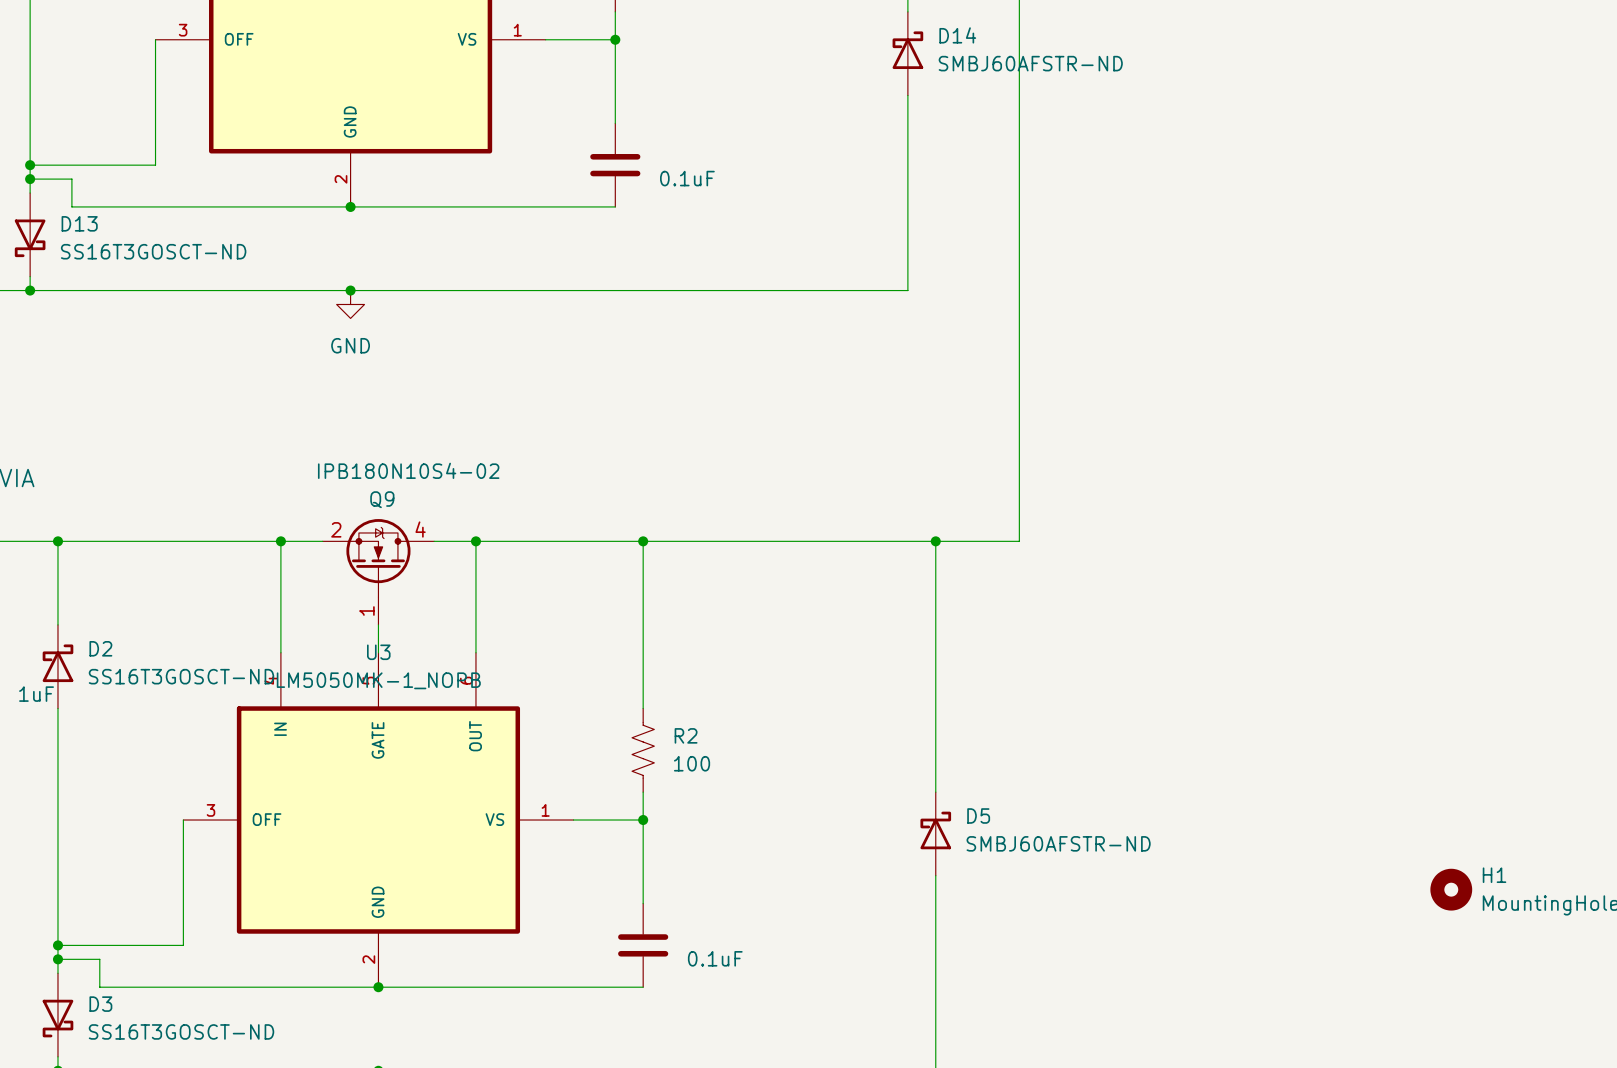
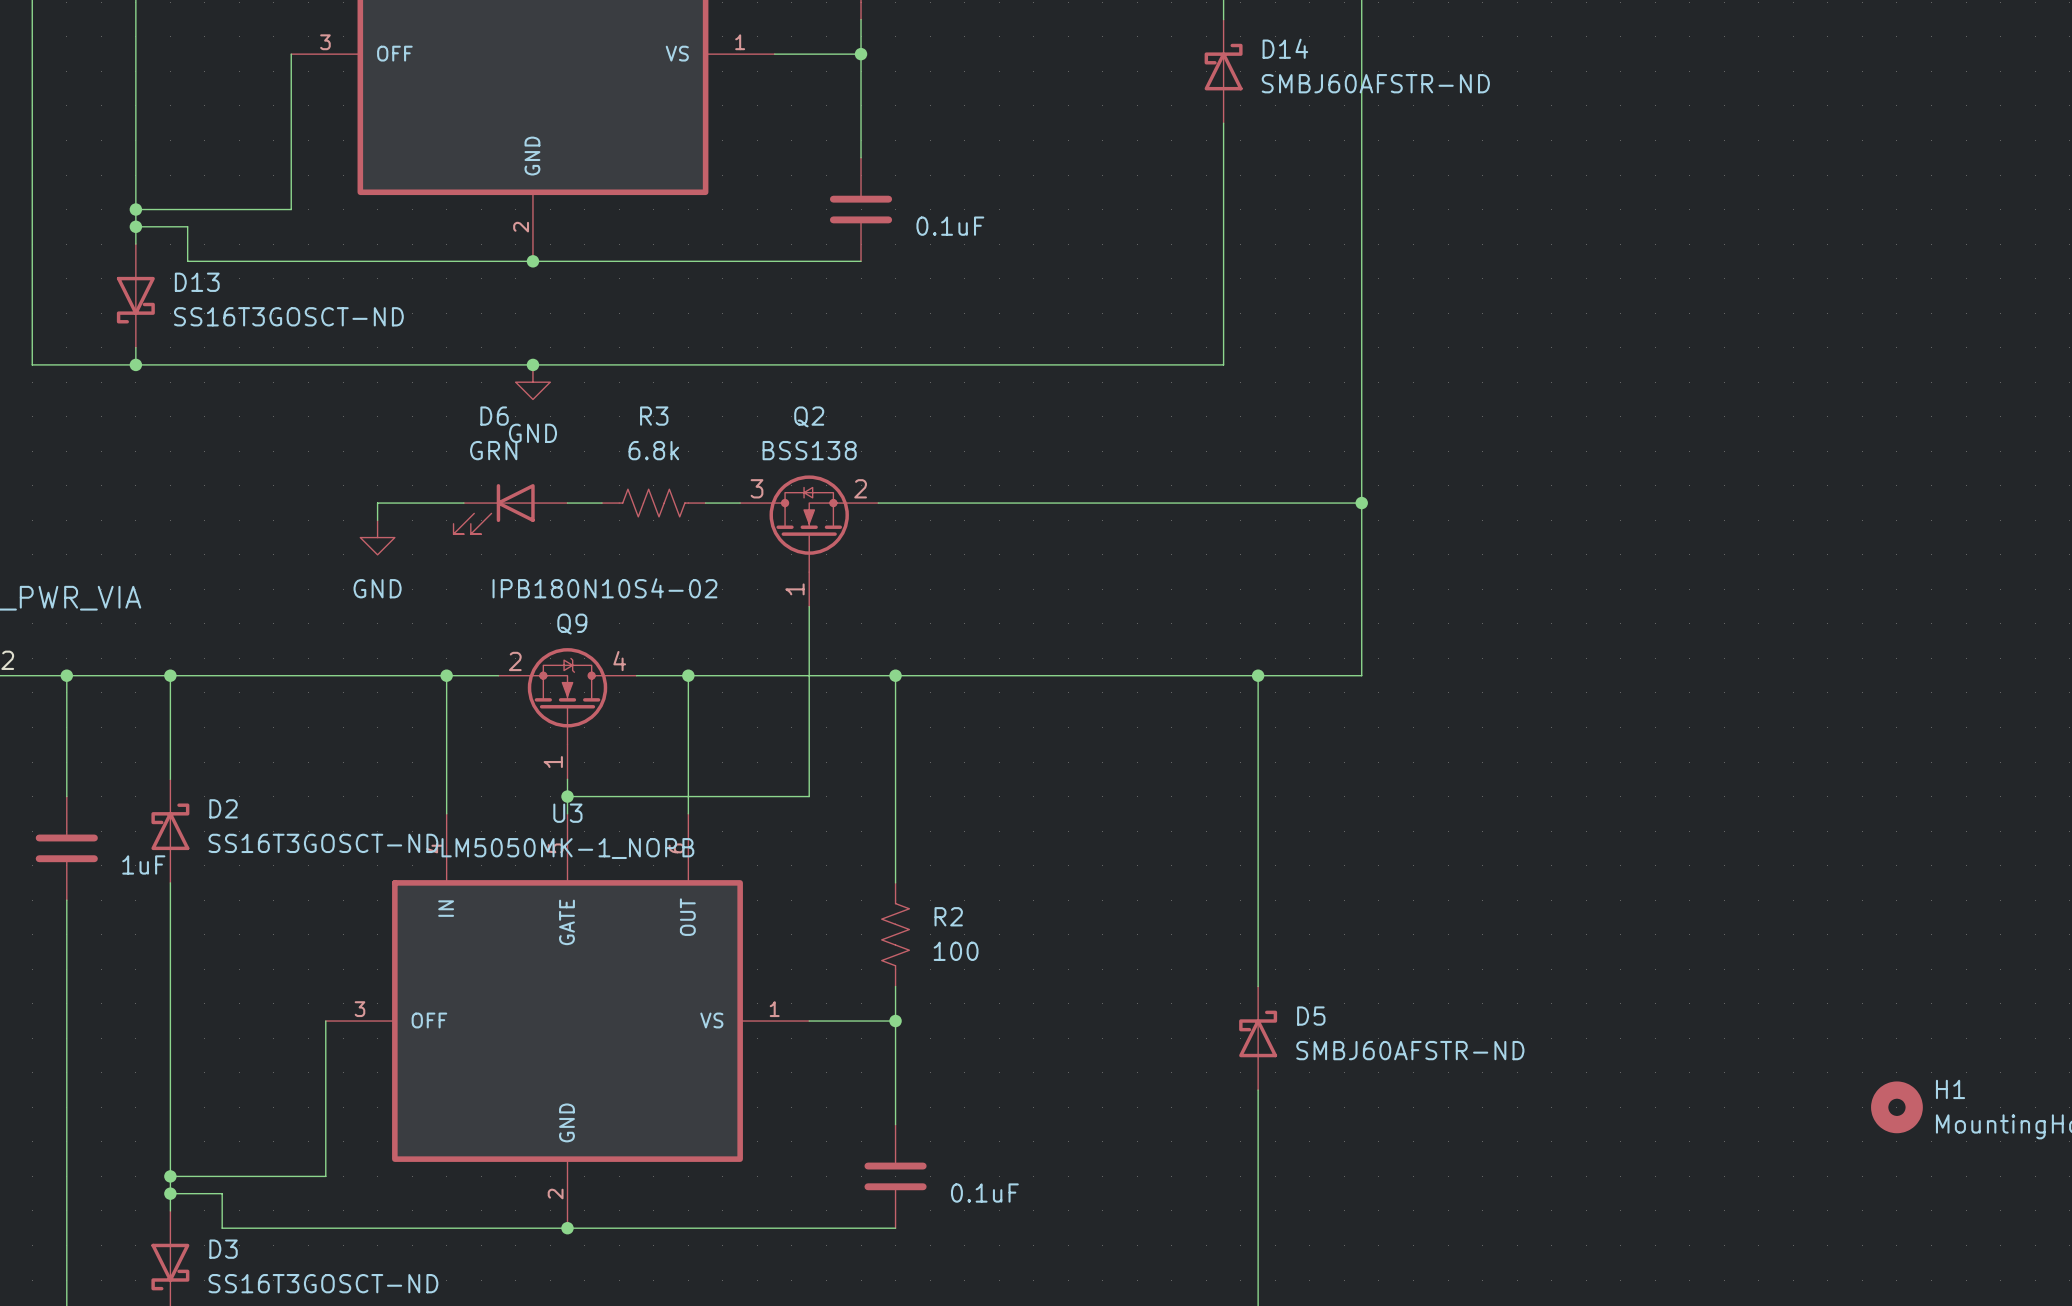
wire: none -> (463, 503) (377, 503) (377, 520)
wire: none -> (567, 503) (602, 503)
R3: none -> 6.8k (653, 503)
wire: none -> (705, 503) (740, 503)
wire: none -> (878, 503) (1361, 503)
junction: none -> (1361, 503)
D6: none -> GRN (510, 509)
power symbol: none -> GND (377, 537)
Q2: none -> BSS138 (809, 541)
wire: none -> (809, 606) (809, 796) (567, 796)
junction: none -> (567, 796)

